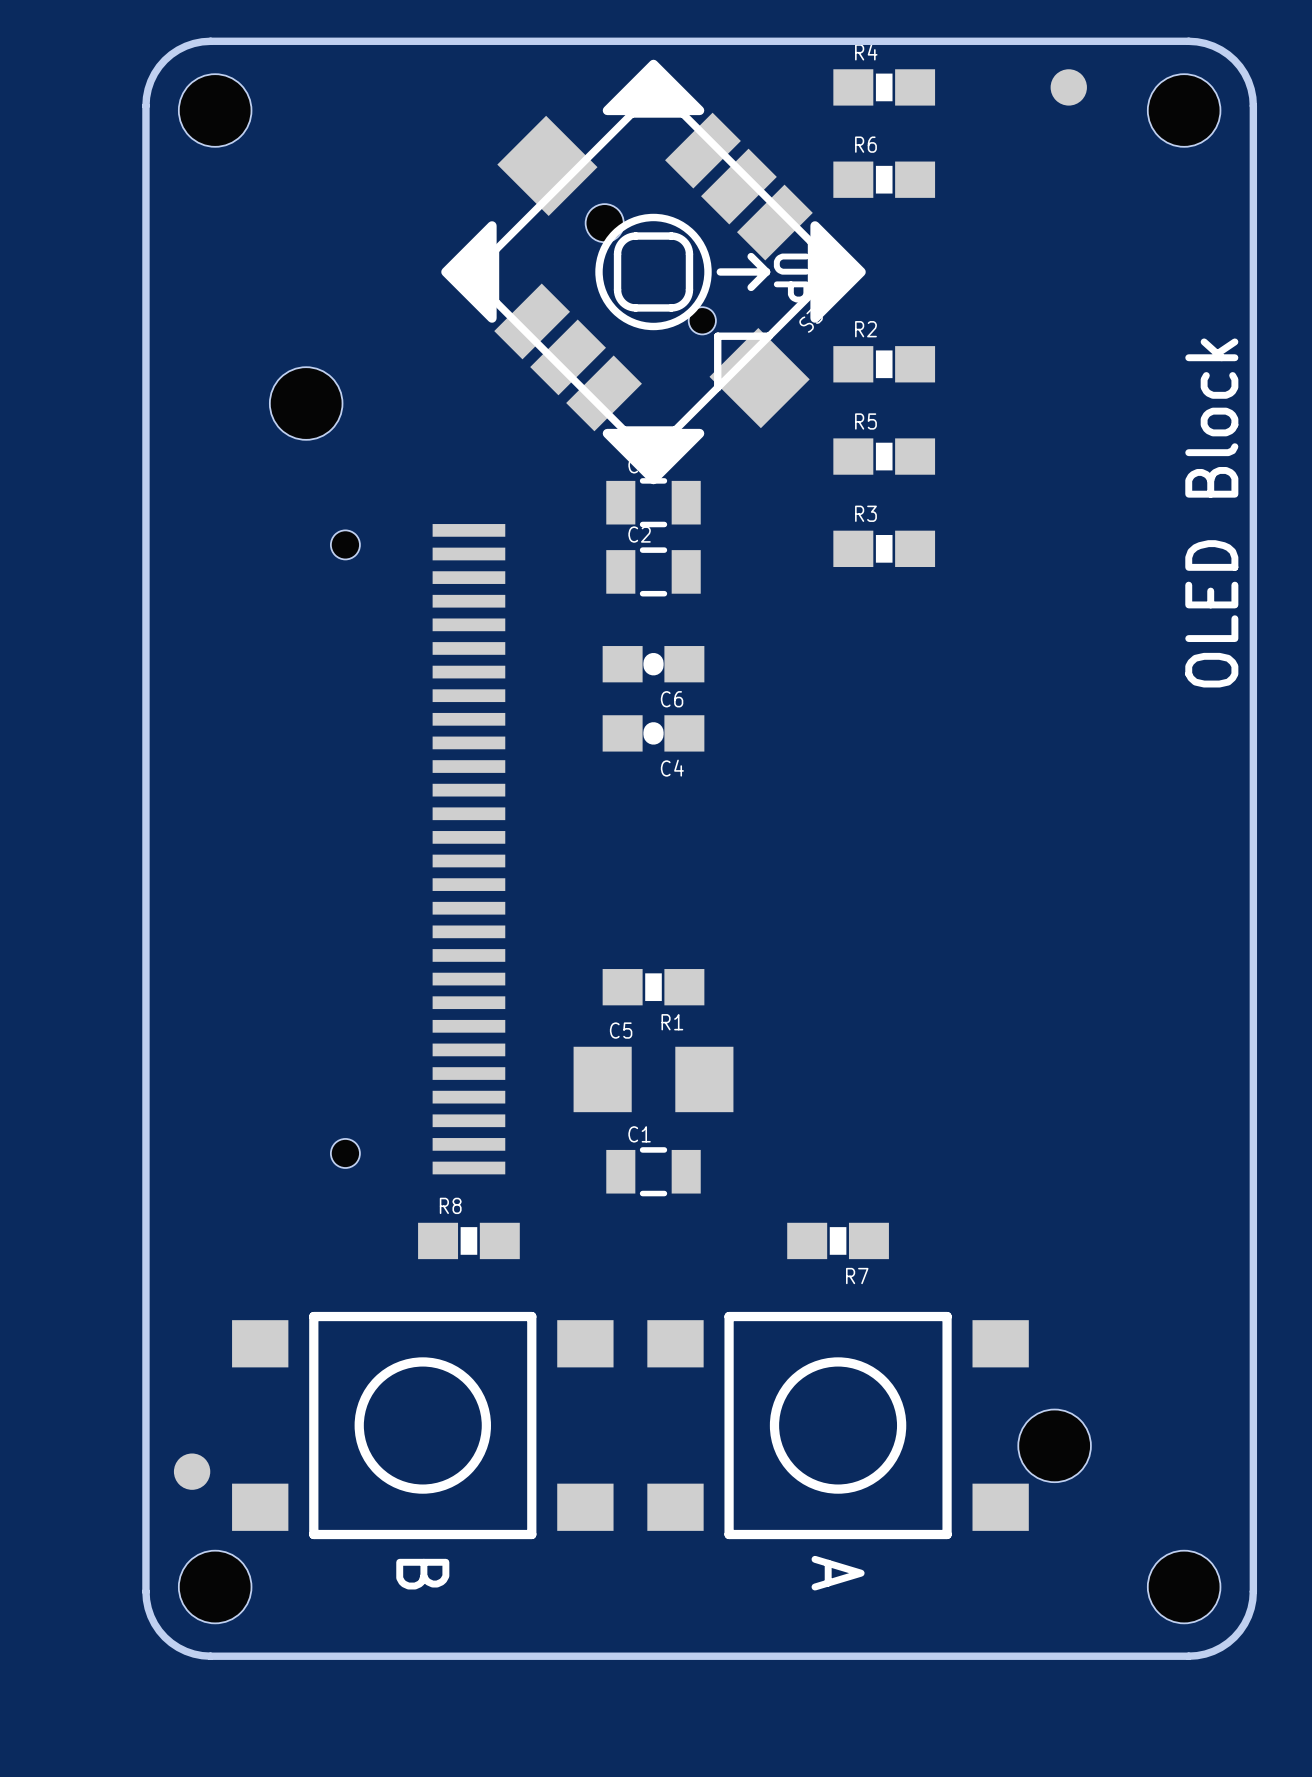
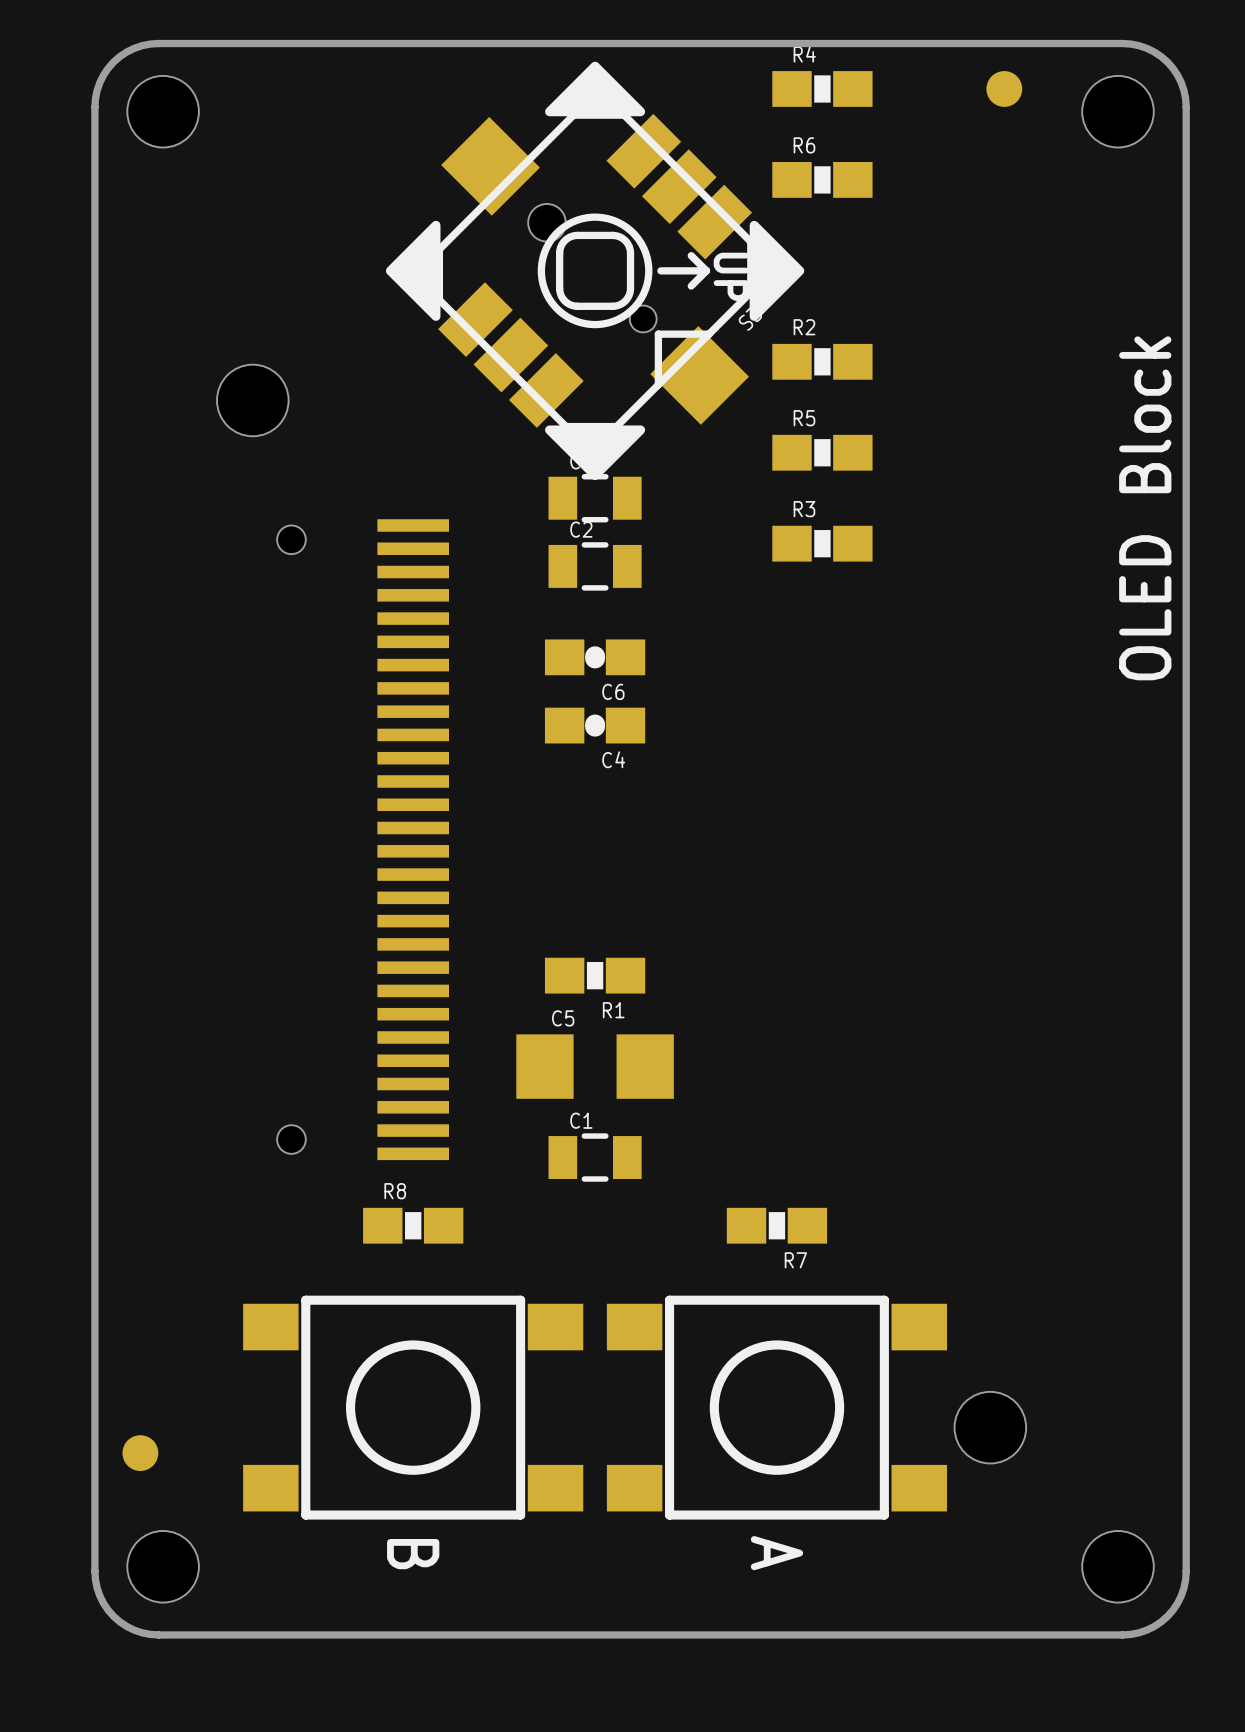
part footprint: [647, 1311, 1029, 1540] -> [606, 1295, 948, 1520]
part: (422, 1425) -> none
part: none -> (413, 1407)
text position: B (422, 1574) -> B (413, 1554)

